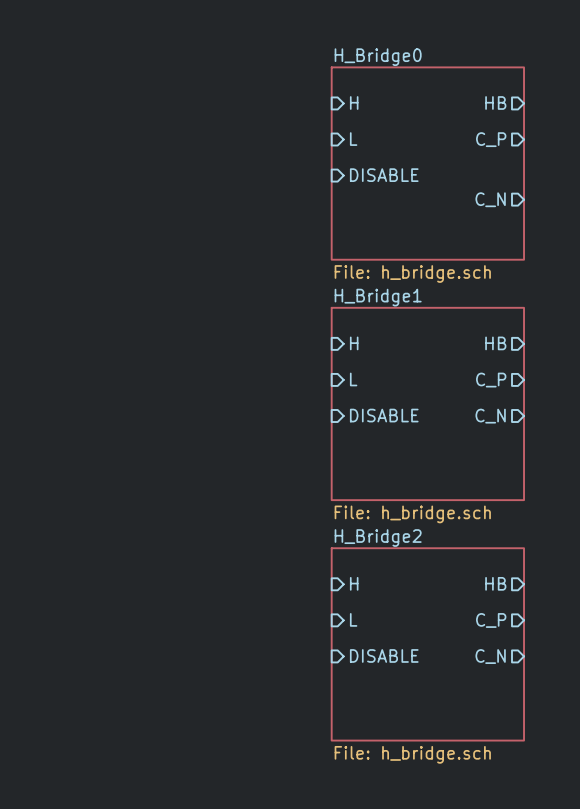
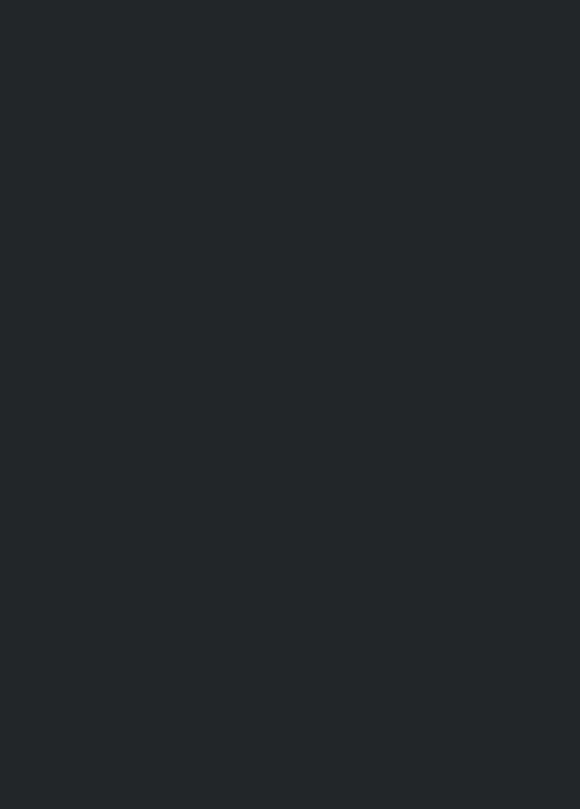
sheet pin: H (354, 102) -> none
sheet pin: HB (495, 102) -> none
sheet pin: L (353, 139) -> none
sheet pin: C_P (491, 139) -> none
sheet H_Bridge0: File: h_bridge.sch (427, 163) -> none
sheet pin: DISABLE (384, 175) -> none
sheet pin: C_N (490, 199) -> none
sheet pin: H (354, 343) -> none
sheet pin: HB (495, 343) -> none
sheet pin: L (353, 379) -> none
sheet pin: C_P (491, 380) -> none
sheet H_Bridge1: File: h_bridge.sch (427, 403) -> none
sheet pin: DISABLE (384, 415) -> none
sheet pin: C_N (490, 416) -> none
sheet pin: H (354, 583) -> none
sheet pin: HB (495, 583) -> none
sheet pin: L (353, 619) -> none
sheet pin: C_P (491, 620) -> none
sheet H_Bridge2: File: h_bridge.sch (427, 644) -> none
sheet pin: DISABLE (384, 655) -> none
sheet pin: C_N (490, 656) -> none

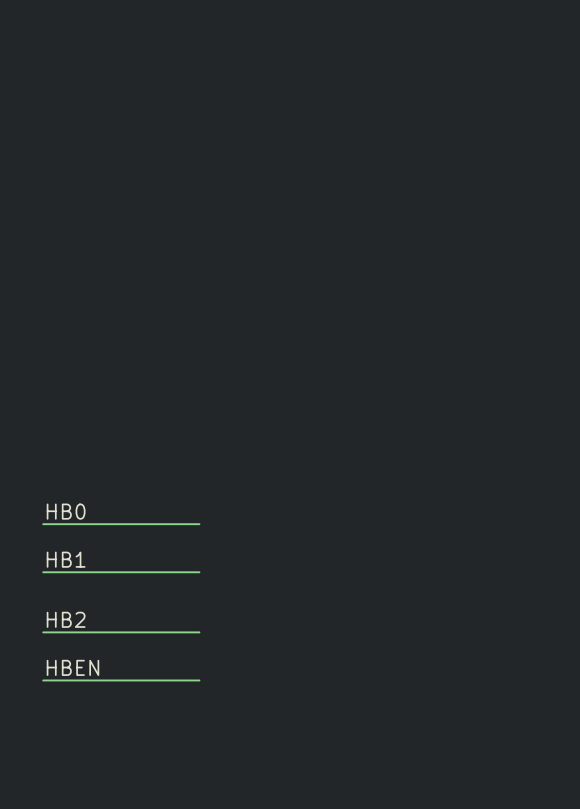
label: none -> HB0 (66, 511)
wire: none -> (43, 524) (199, 524)
label: none -> HB1 (66, 559)
wire: none -> (43, 572) (199, 572)
label: none -> HB2 (66, 619)
wire: none -> (43, 632) (199, 632)
label: none -> HBEN (72, 667)
wire: none -> (43, 680) (199, 680)

